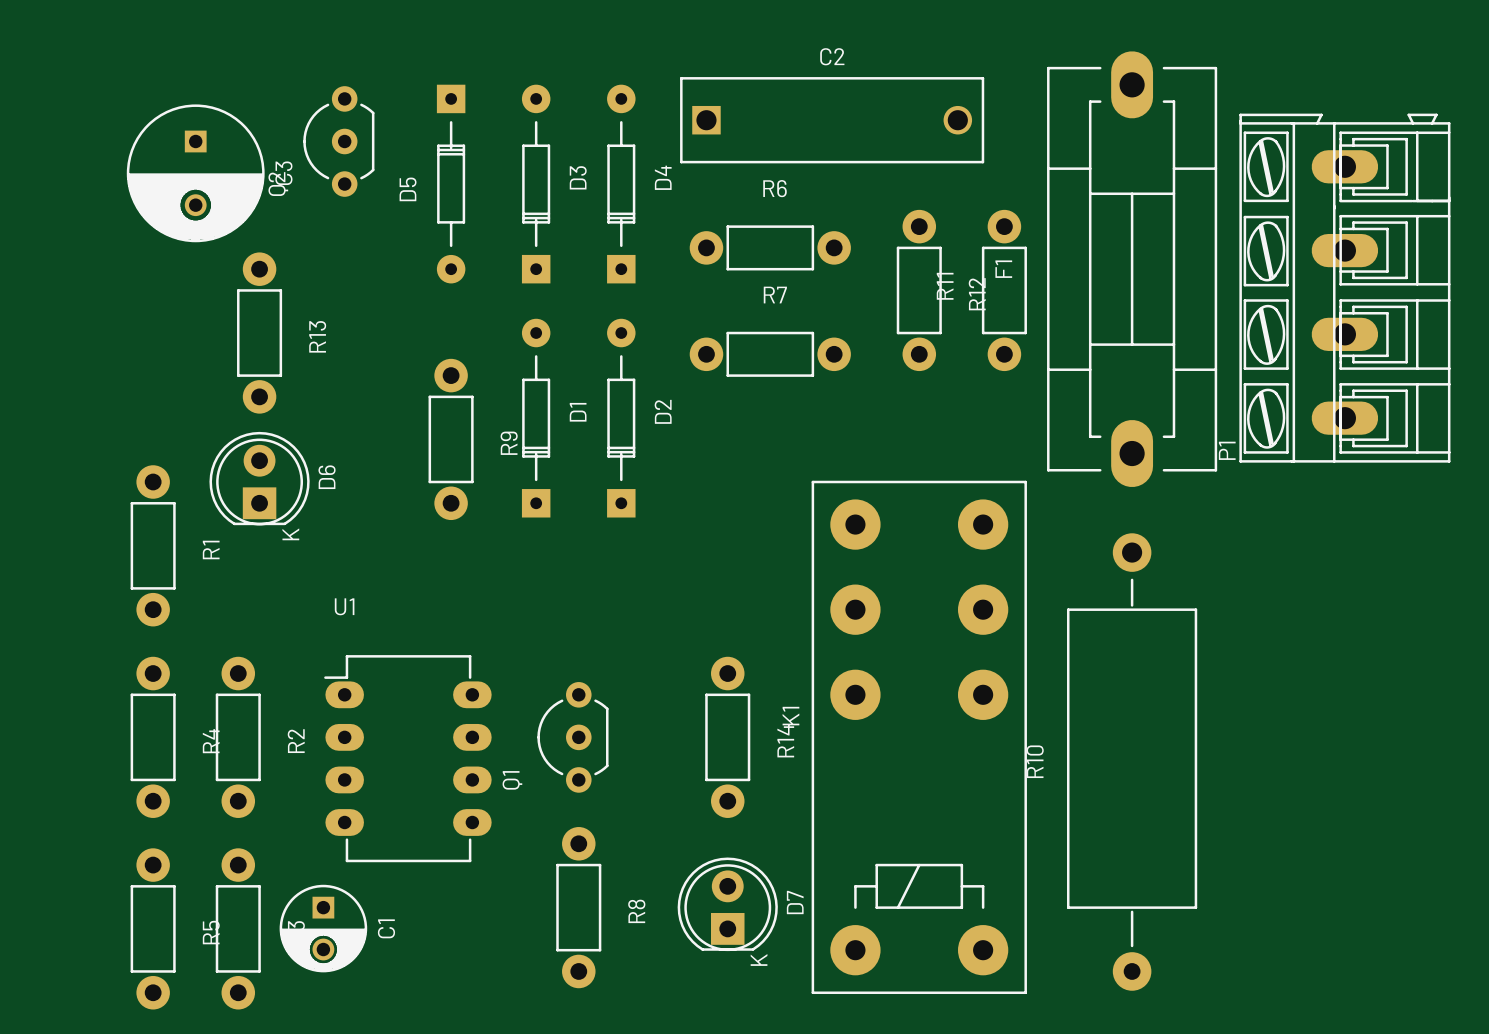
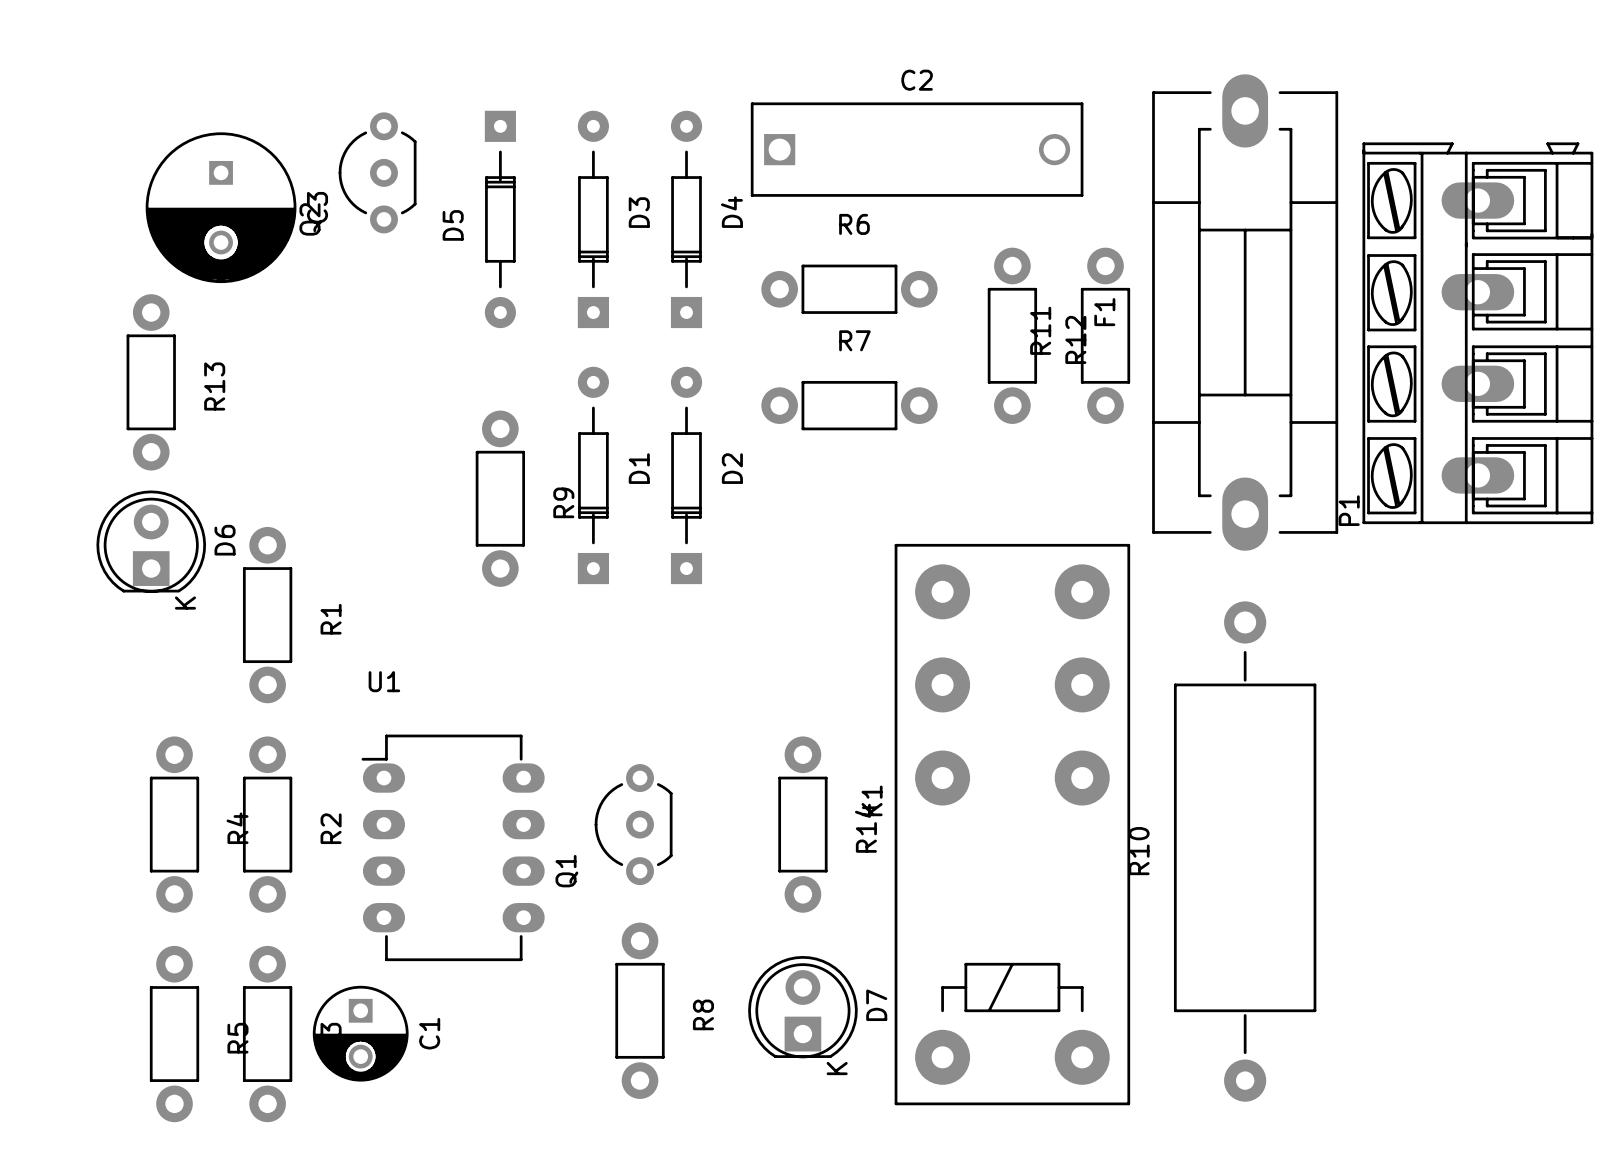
R13 position: (259, 333) -> (151, 382)
D6 position: (259, 478) -> (151, 541)
R1 position: (153, 545) -> (267, 615)

